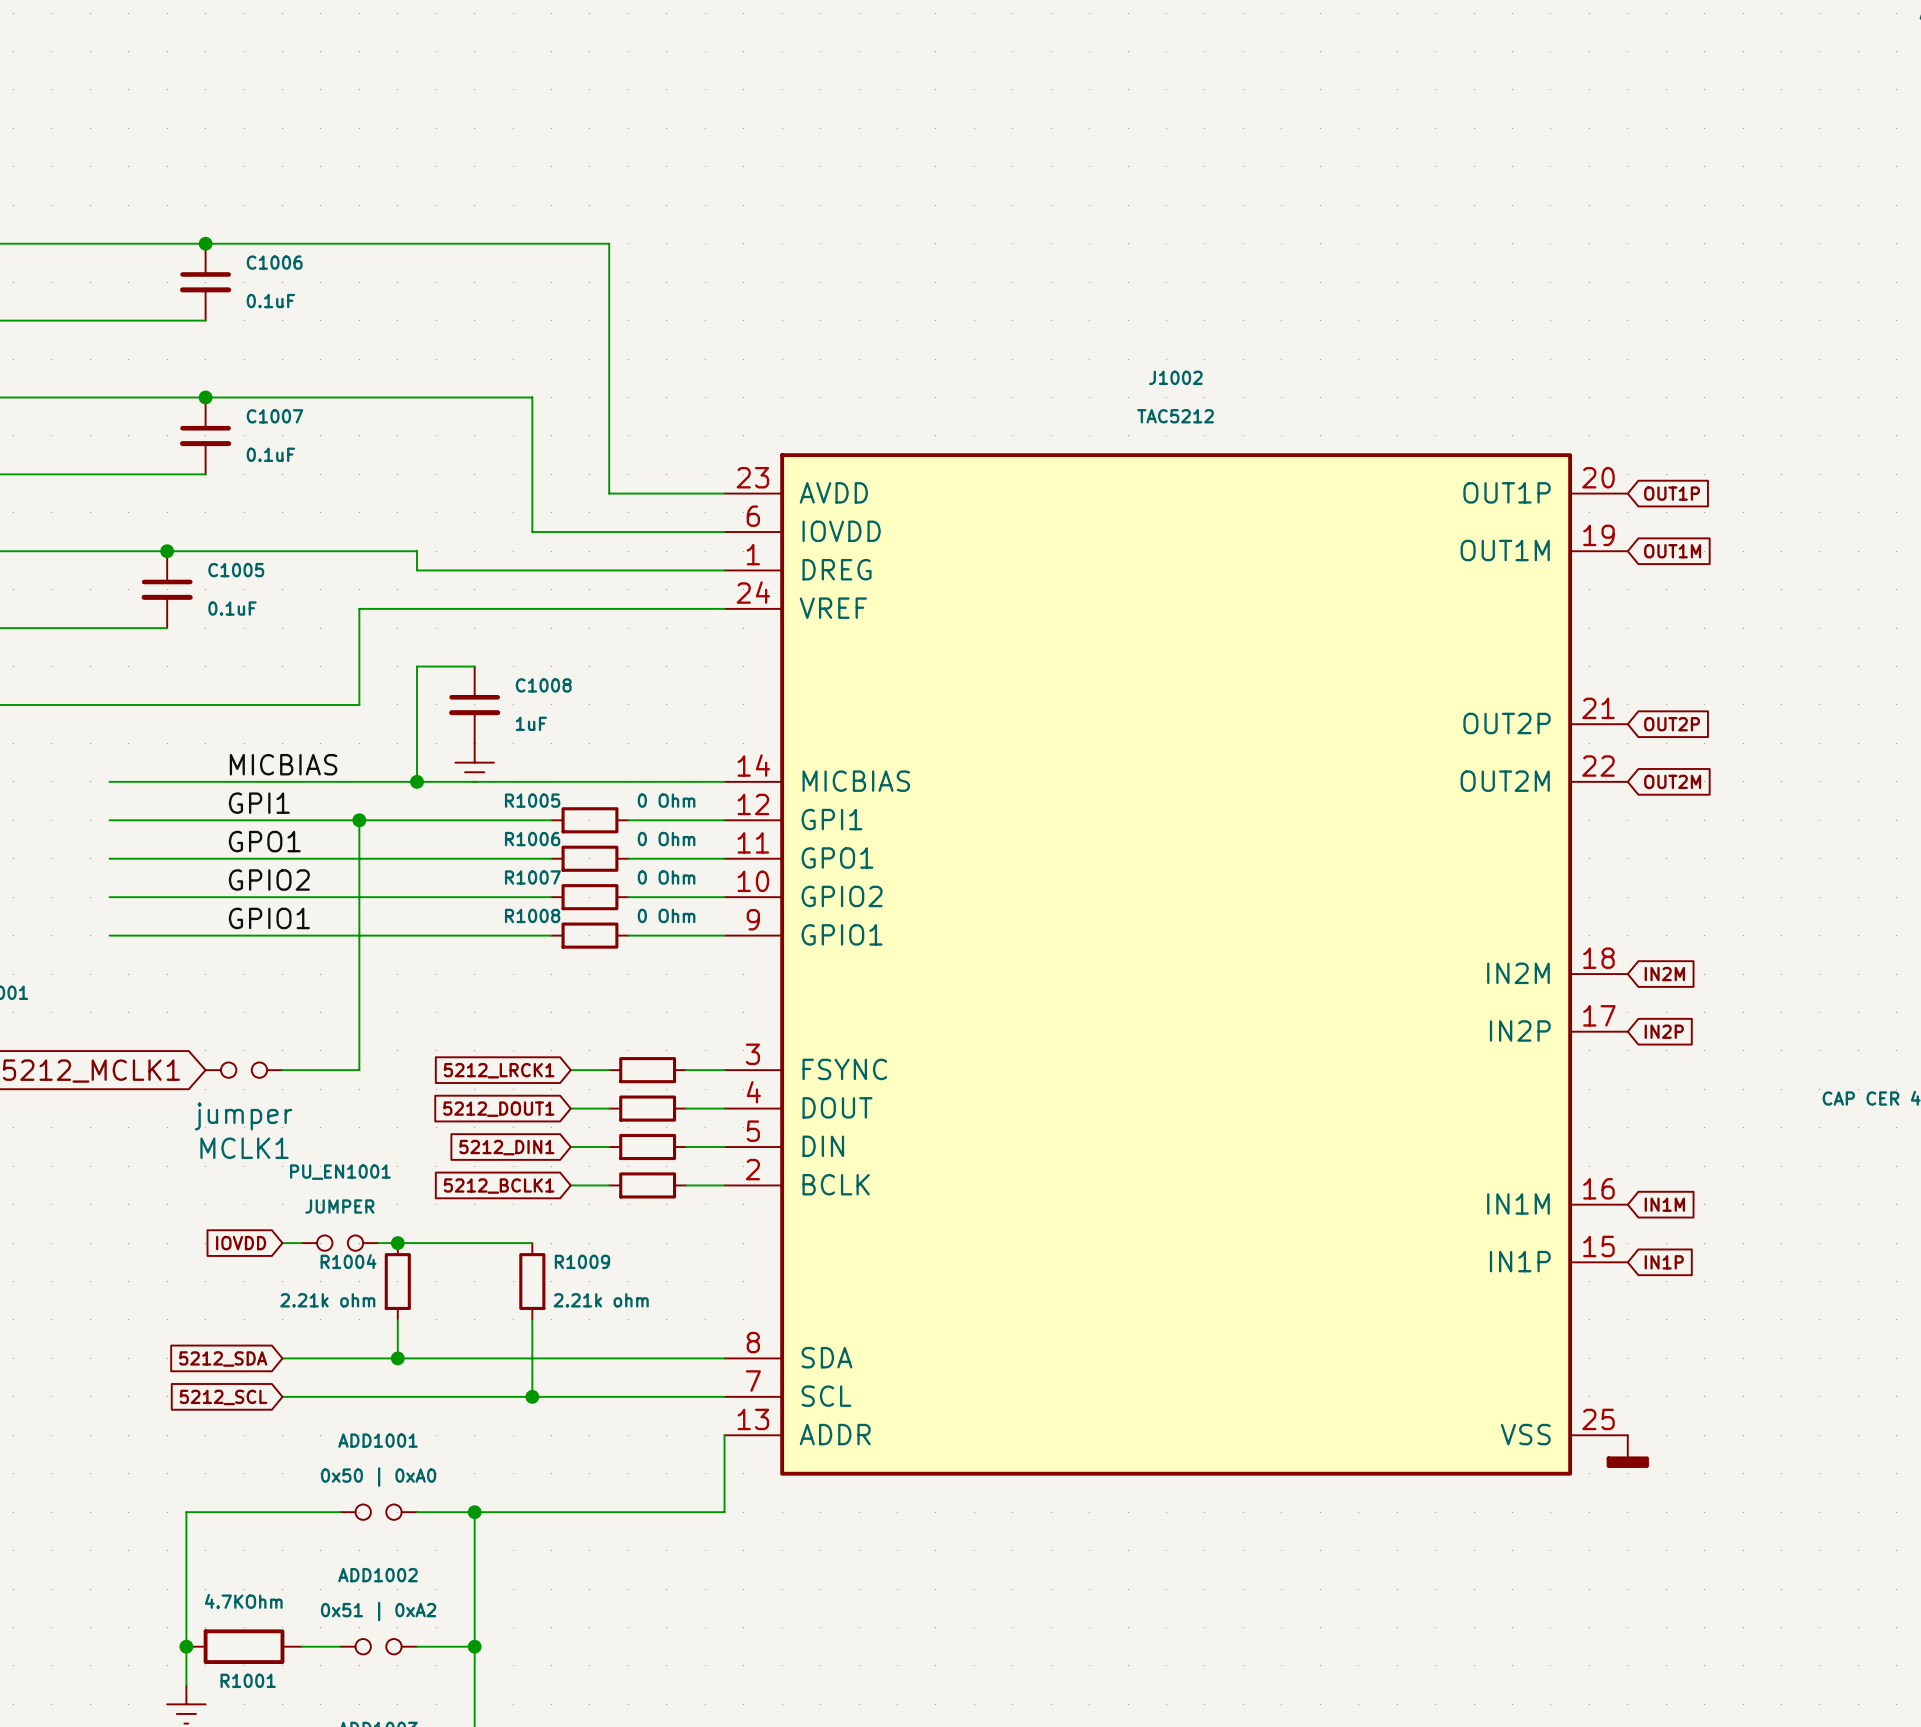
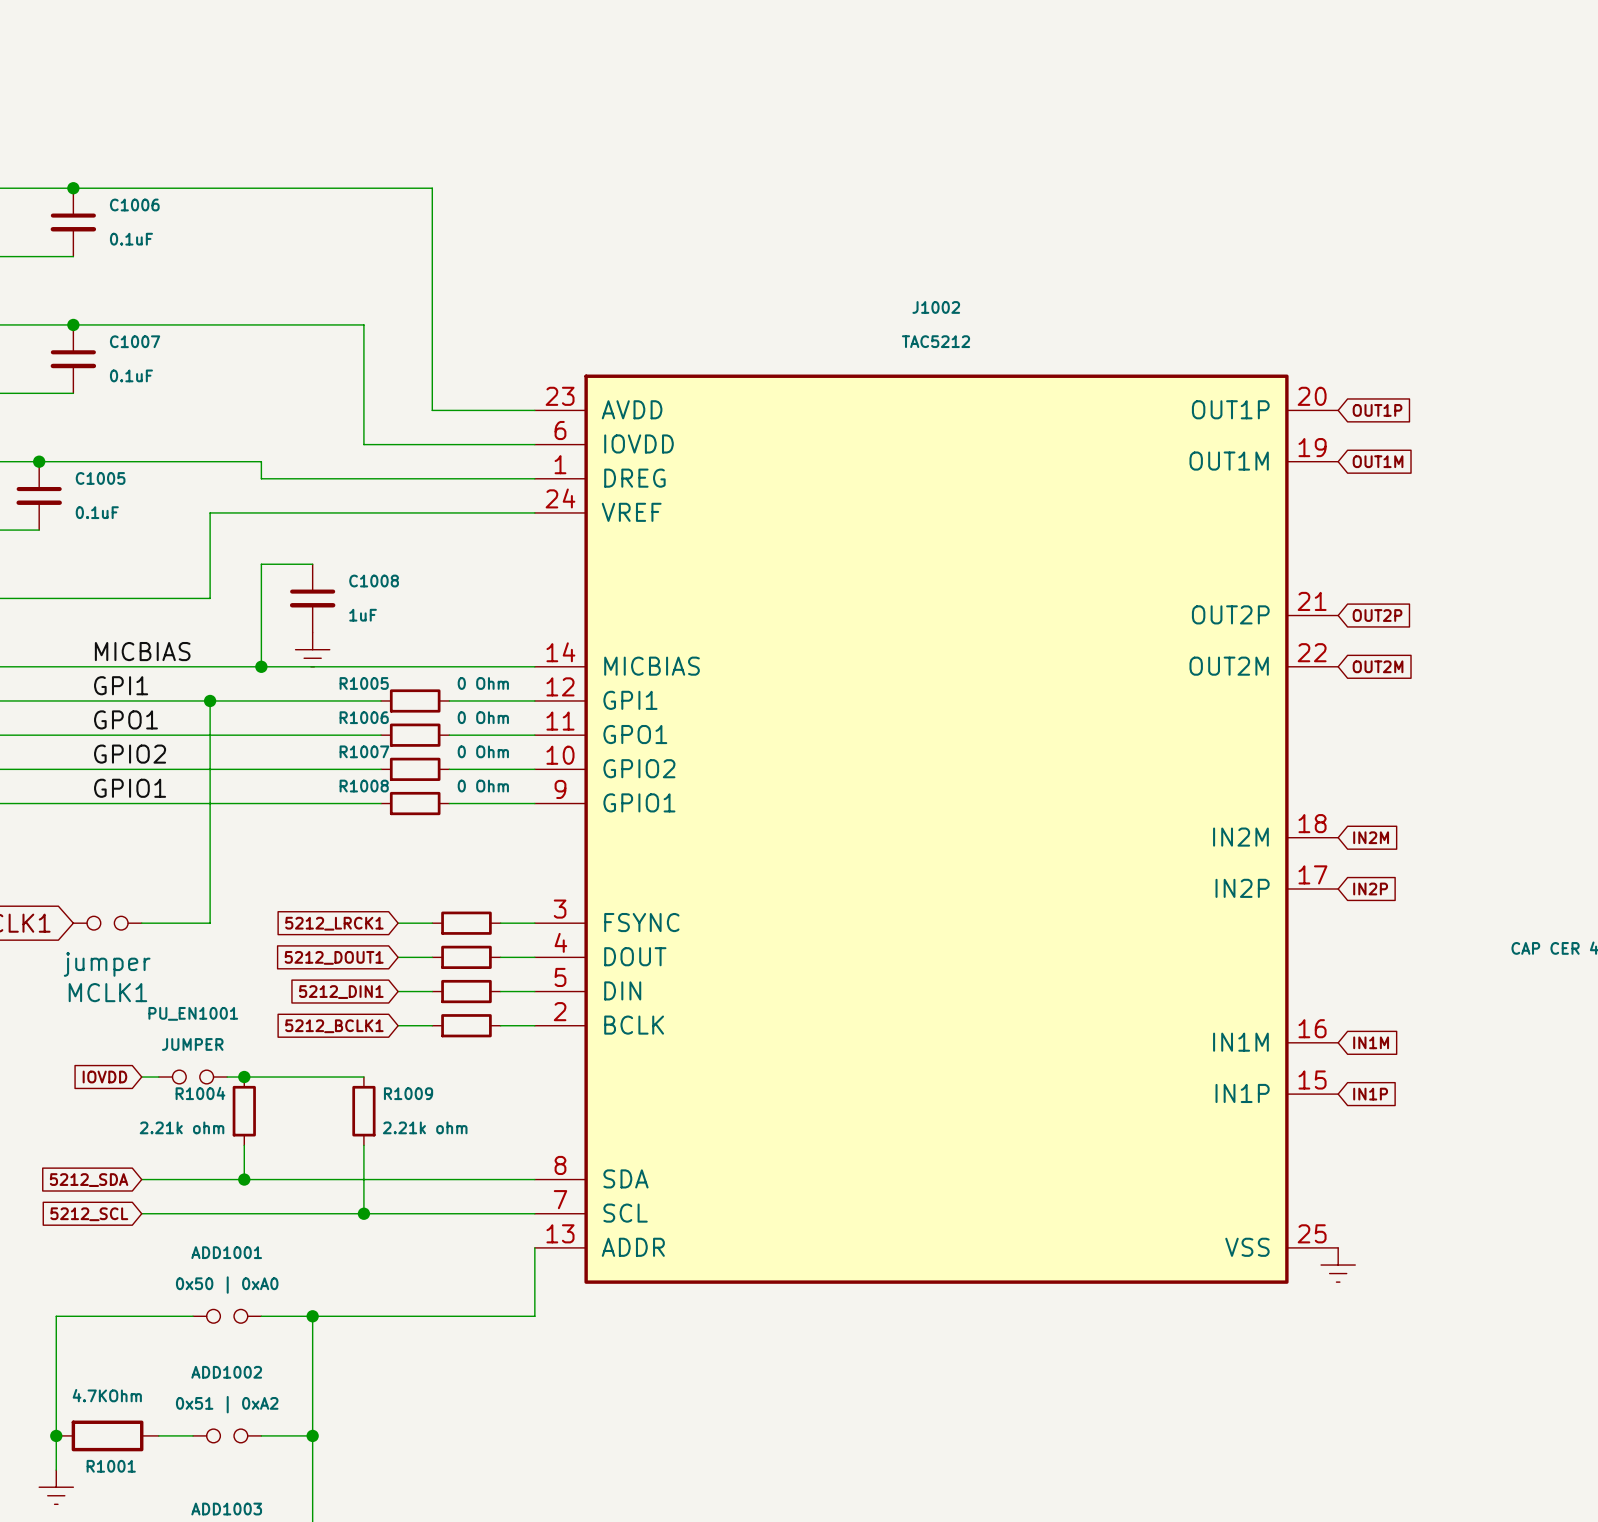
power symbol shape: [1606, 1435, 1649, 1468] -> [1321, 1247, 1356, 1283]

